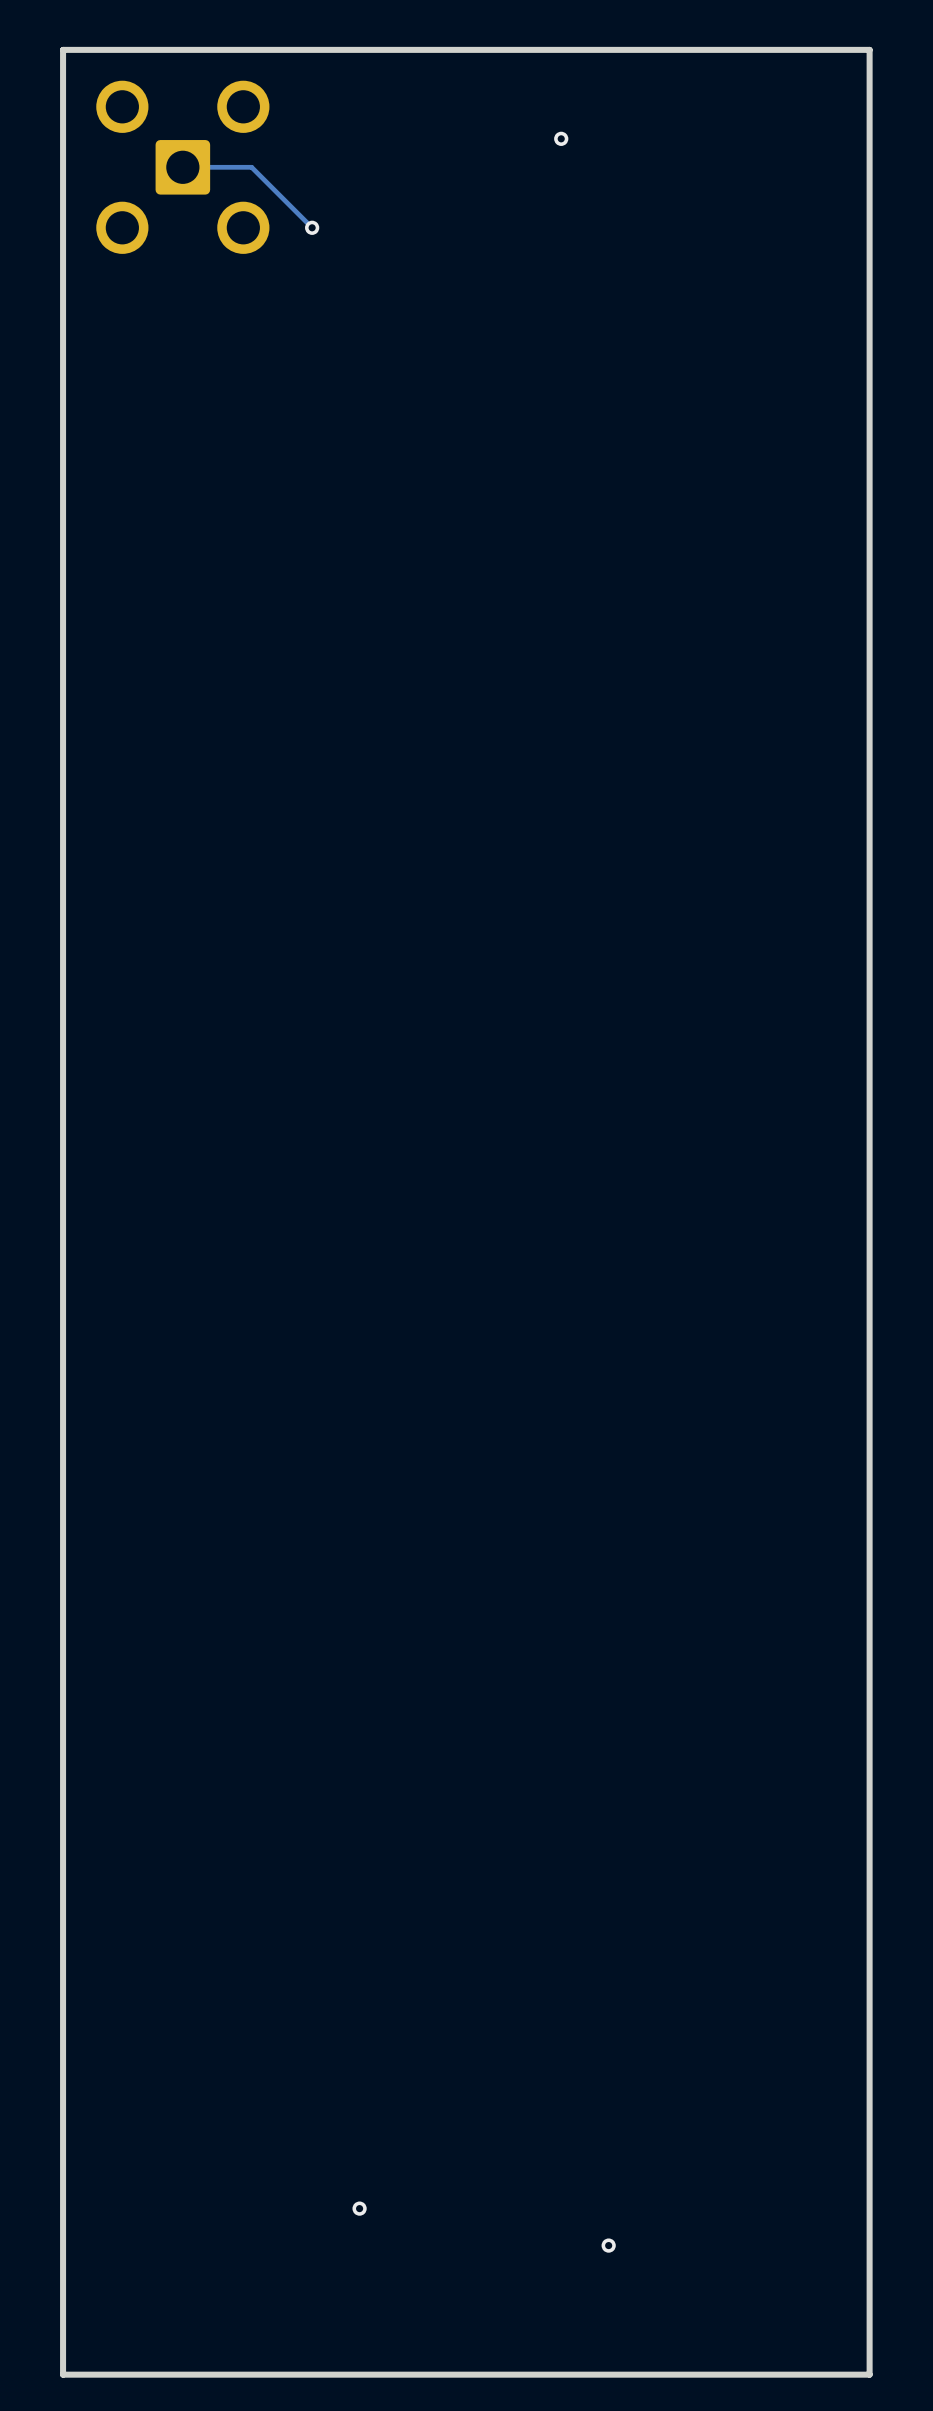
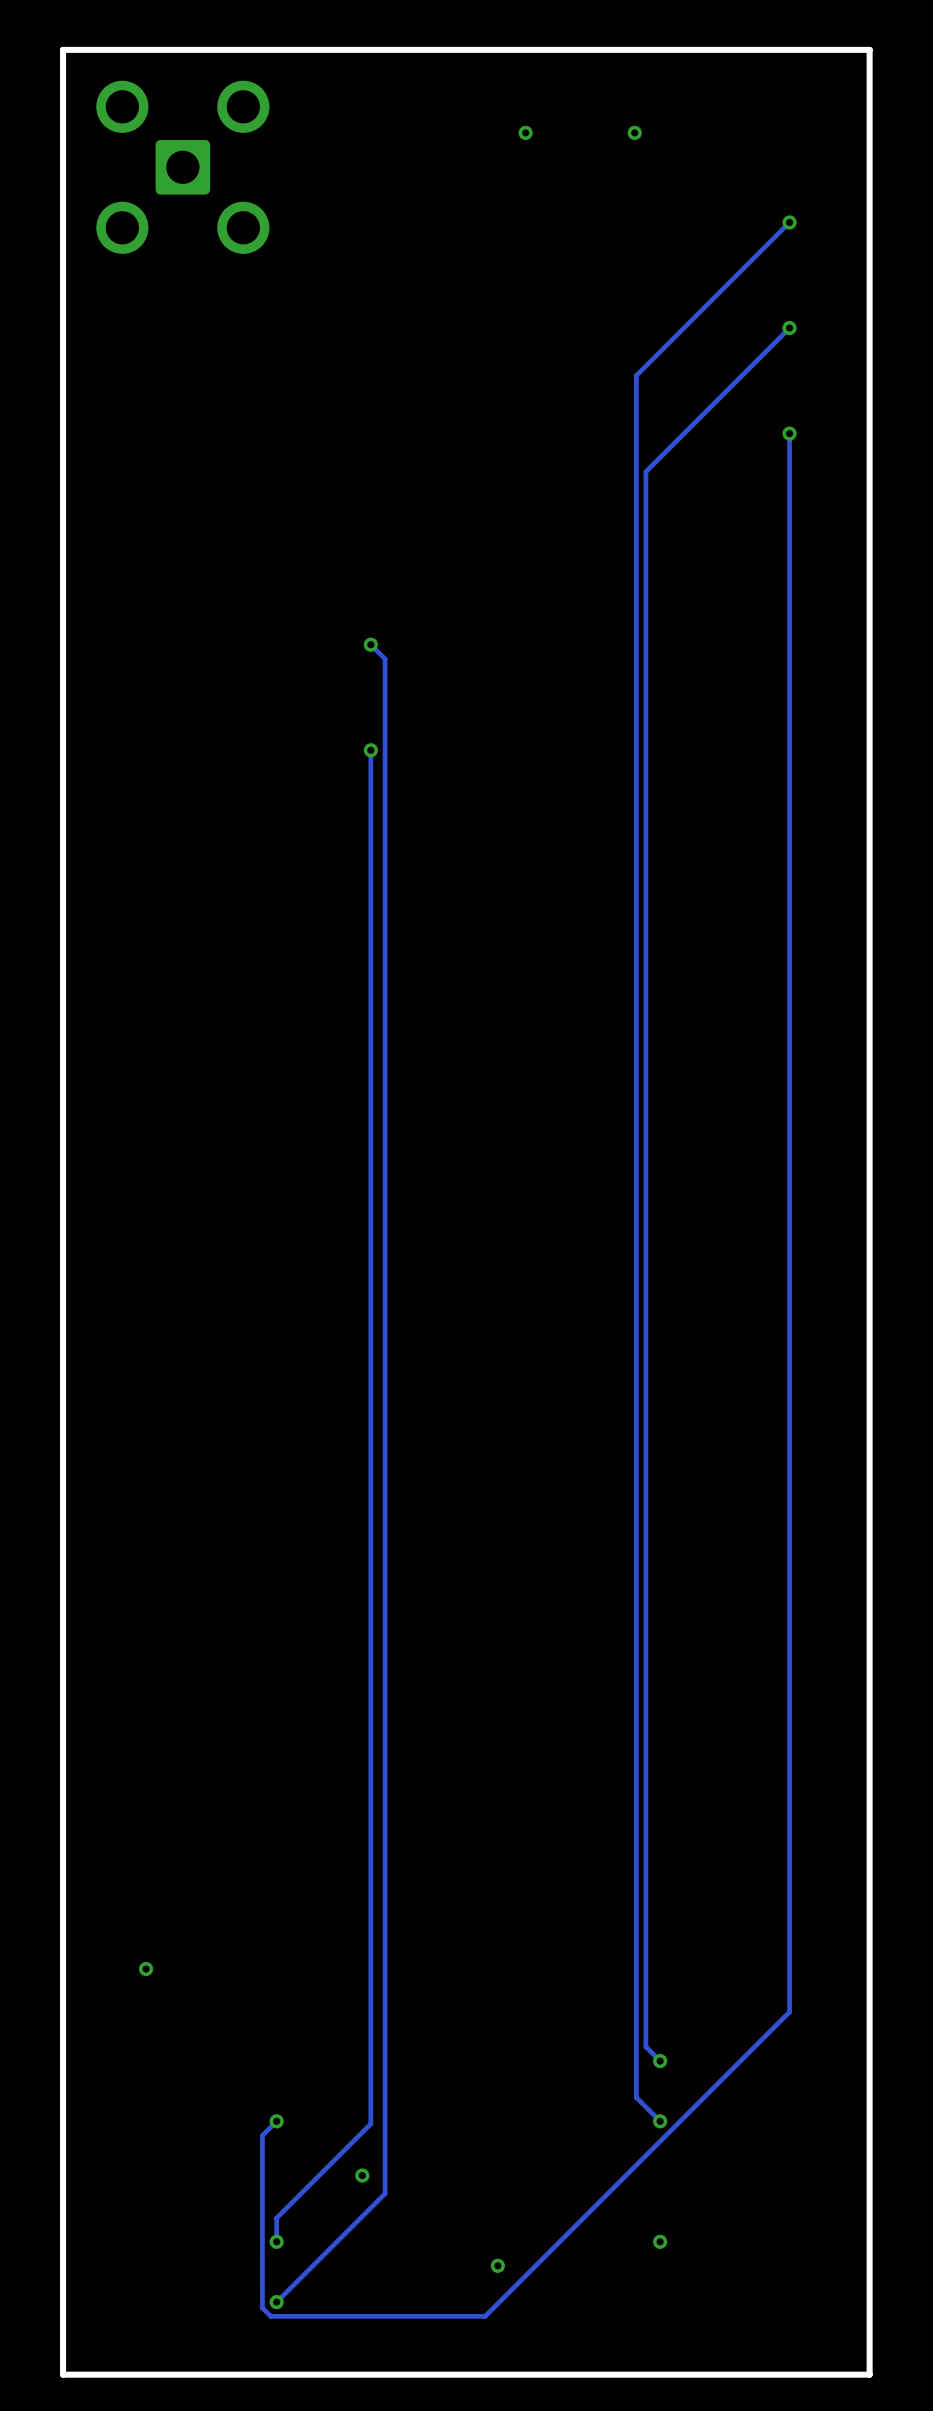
via: none -> (634, 132)
via position: (561, 138) -> (525, 132)
track: (182, 167) (251, 167) (312, 227) -> none
track: none -> (789, 222) (636, 375) (636, 2097) (660, 2121)
via: none -> (789, 222)
via: (312, 227) -> none
track: none -> (789, 328) (645, 471) (645, 2046) (660, 2061)
via: none -> (789, 328)
track: none -> (789, 433) (789, 2012) (485, 2316) (270, 2316) (262, 2307) (262, 2135) (276, 2121)
via: none -> (789, 433)
track: none -> (370, 644) (385, 658) (385, 2193) (276, 2302)
via: none -> (370, 644)
track: none -> (370, 750) (370, 2123) (276, 2218) (276, 2241)
via: none -> (370, 750)
via: none -> (146, 1969)
via: none -> (660, 2061)
via: none -> (276, 2121)
via: none -> (660, 2121)
via position: (359, 2208) -> (362, 2175)
via: none -> (276, 2241)
via position: (608, 2245) -> (660, 2241)
via: none -> (497, 2265)
via: none -> (276, 2302)

